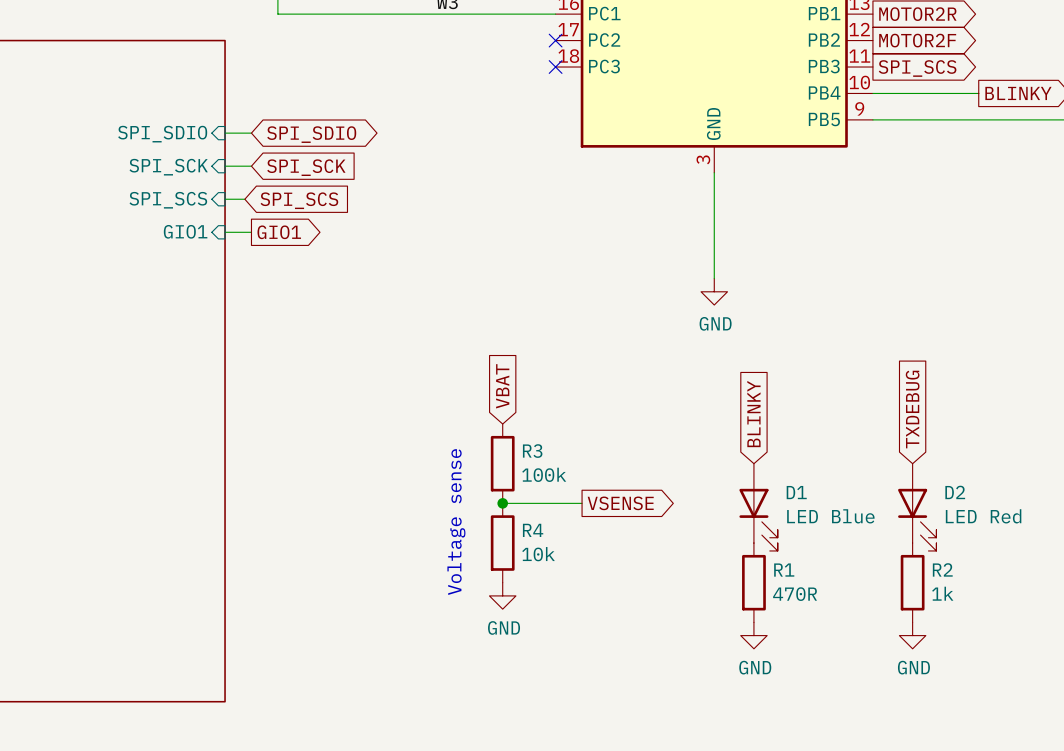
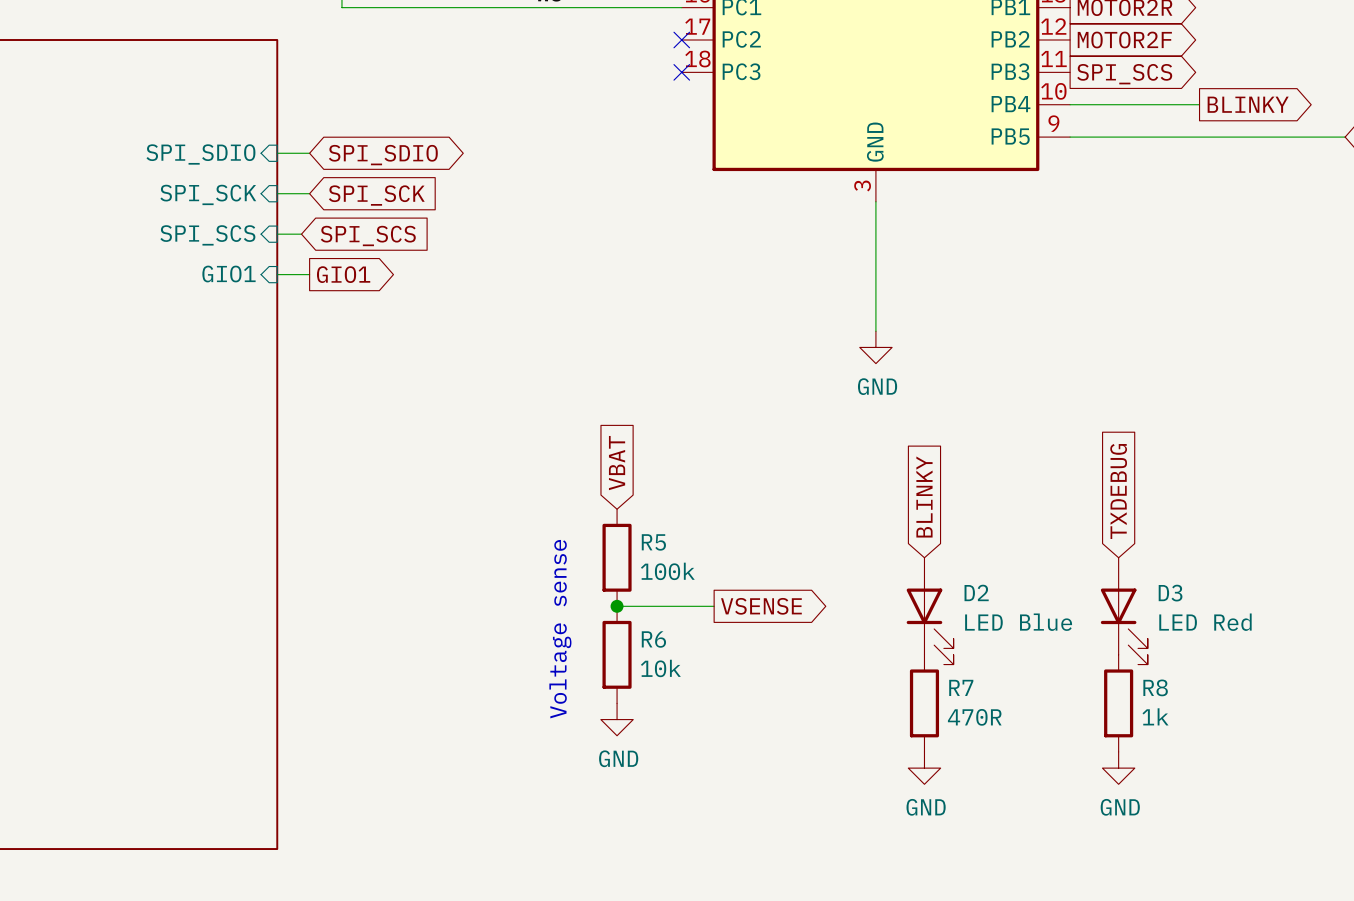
R3 name: R3 (532, 451) -> R5 (653, 542)
D1 name: D1 (796, 492) -> D2 (976, 592)
D2 name: D2 (955, 492) -> D3 (1170, 593)
R4 name: R4 (533, 530) -> R6 (653, 639)
R2 name: R2 (942, 569) -> R8 (1155, 687)
R1 name: R1 (784, 570) -> R7 (961, 687)

